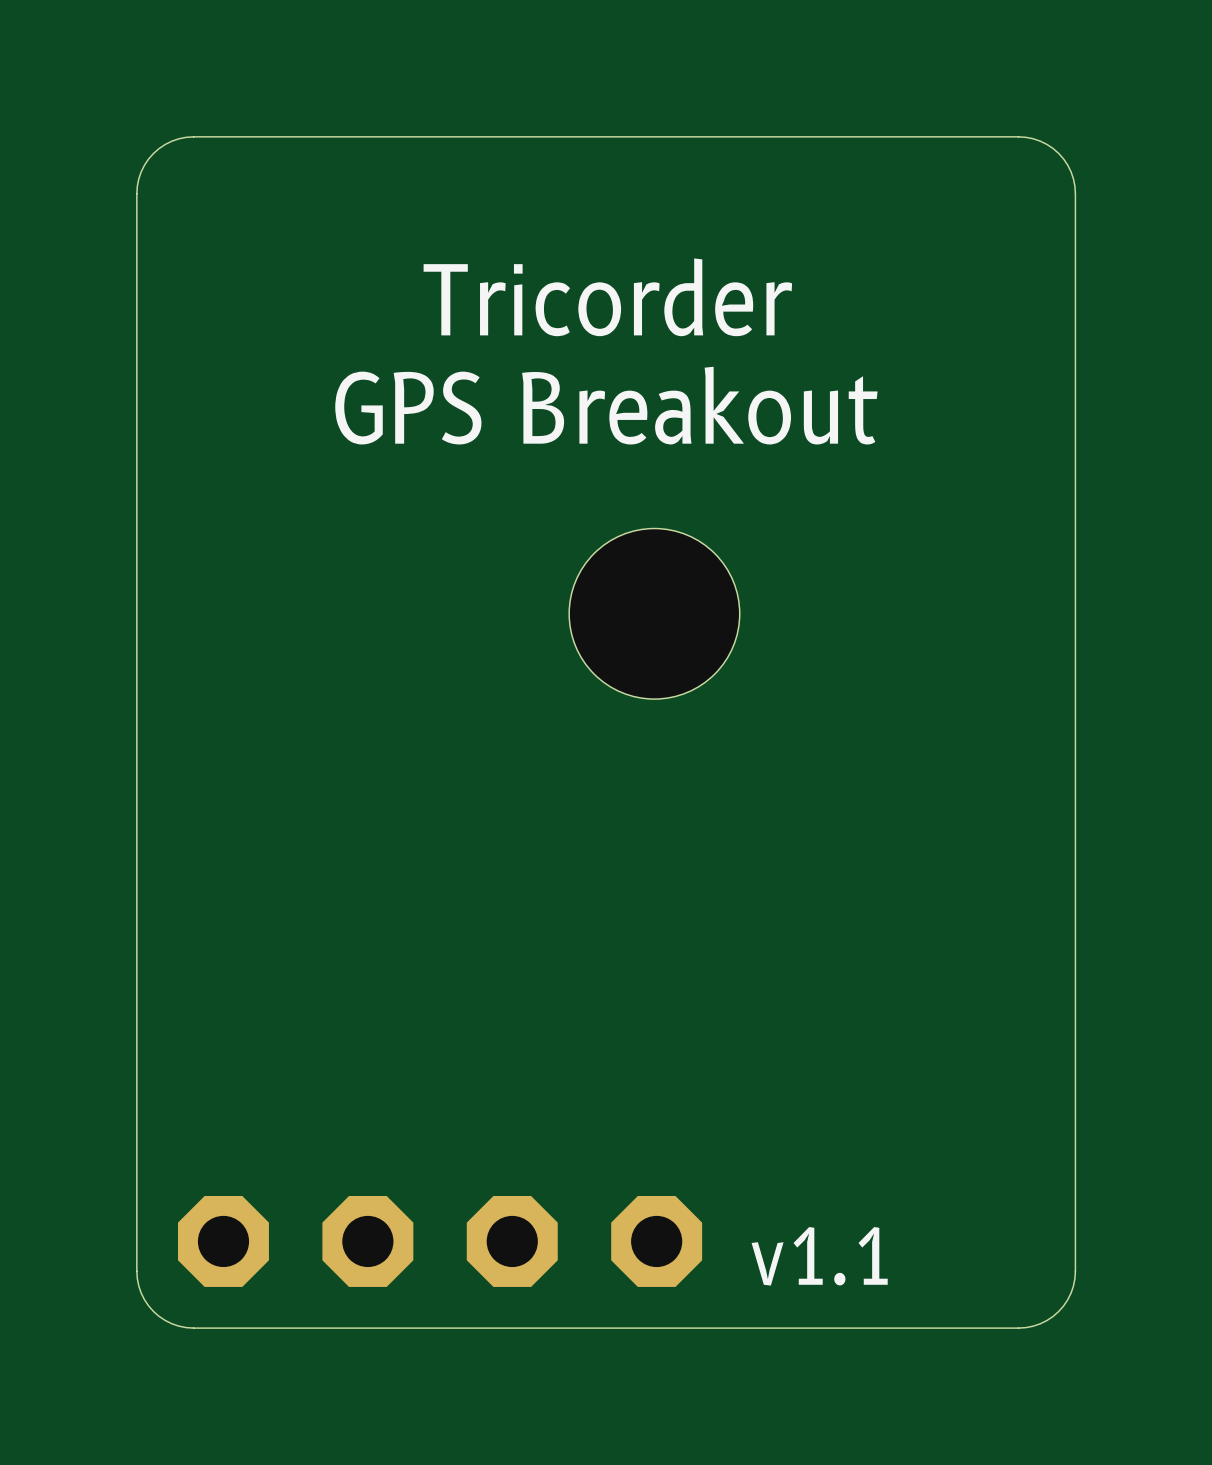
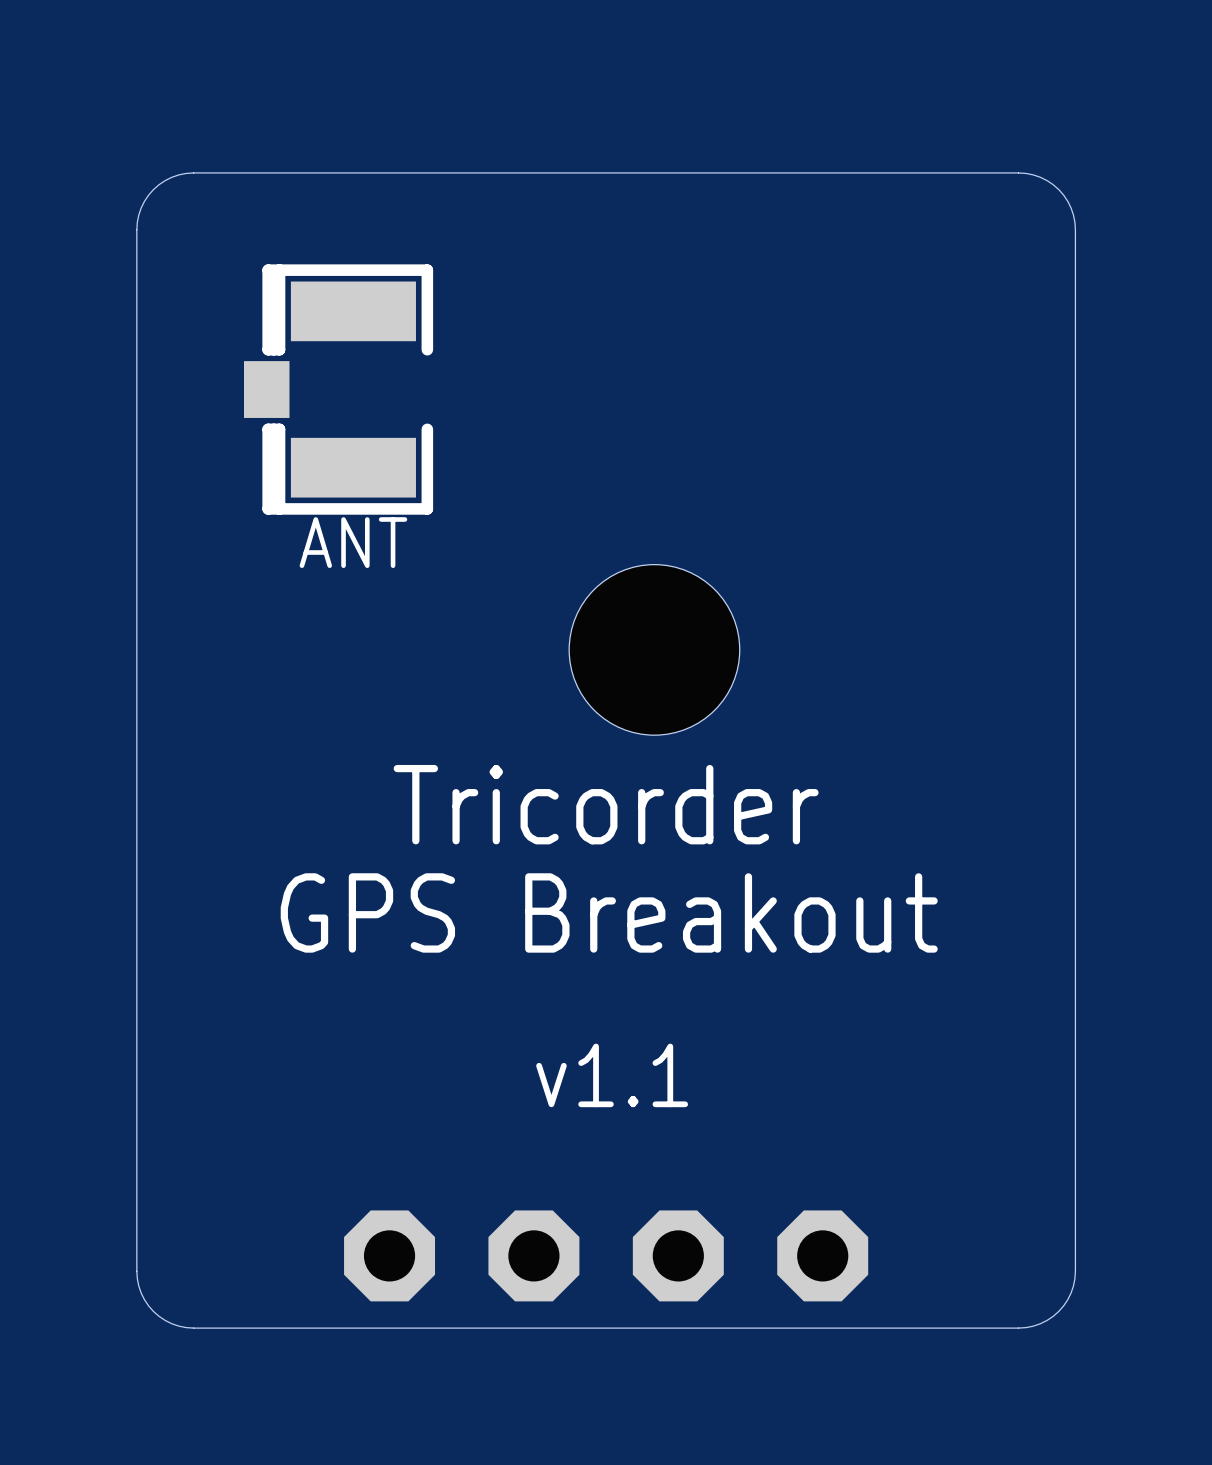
board edge: (1075, 229) (1074, 186) (1067, 165) (1058, 153) (1046, 144) (1033, 138) (1018, 136) (186, 137) (171, 141) (159, 148) (144, 165) (137, 186) (136, 229) -> (1075, 229) (1071, 208) (1058, 189) (1040, 177) (1018, 172) (193, 172) (171, 177) (153, 189) (141, 208) (136, 229)
text position: Tricorder (607, 297) -> Tricorder (606, 804)
ANT: none -> (338, 389)
text position: GPS Breakout (606, 405) -> GPS Breakout (609, 912)
part position: (654, 613) -> (654, 649)
part position: (440, 1241) -> (606, 1255)
text position: v1.1 (819, 1256) -> v1.1 (612, 1075)

